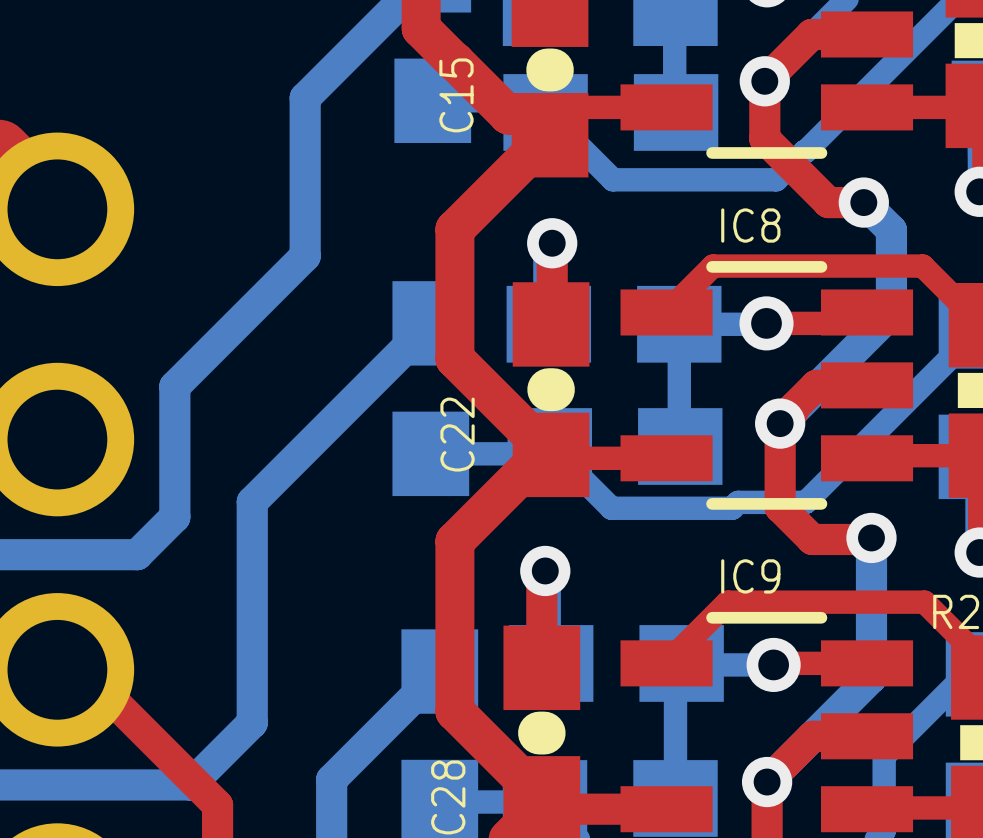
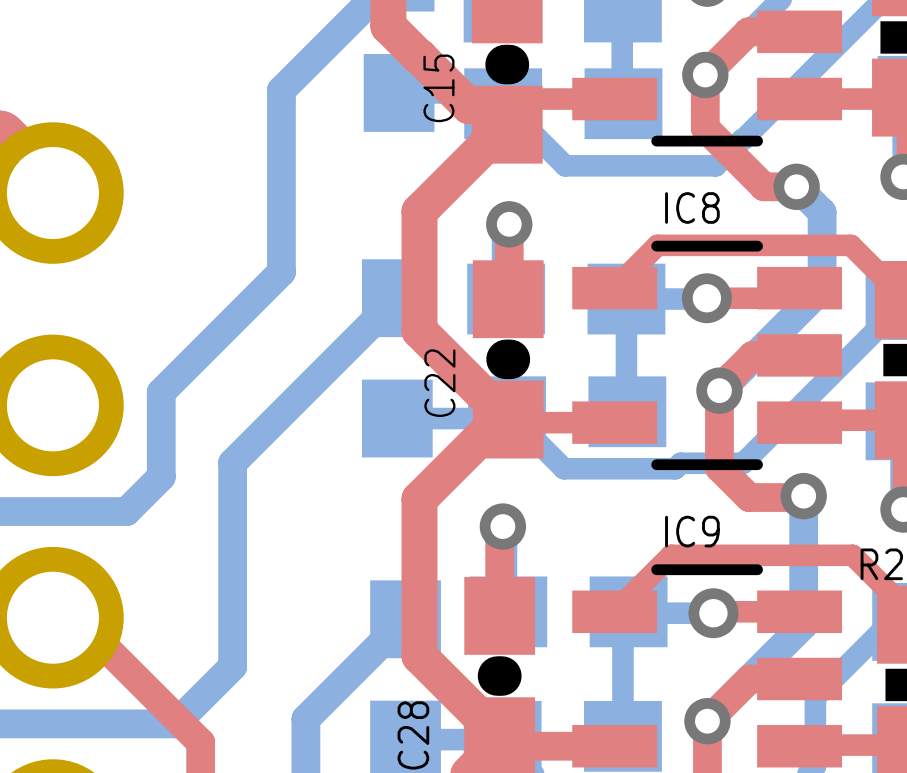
C15 name position: C15 (456, 95) -> C15 (438, 88)
bottom track: (305, 256) (174, 386) (174, 425) -> (281, 236) (281, 272) (161, 392)
C22 name position: C22 (457, 434) -> C22 (439, 383)

